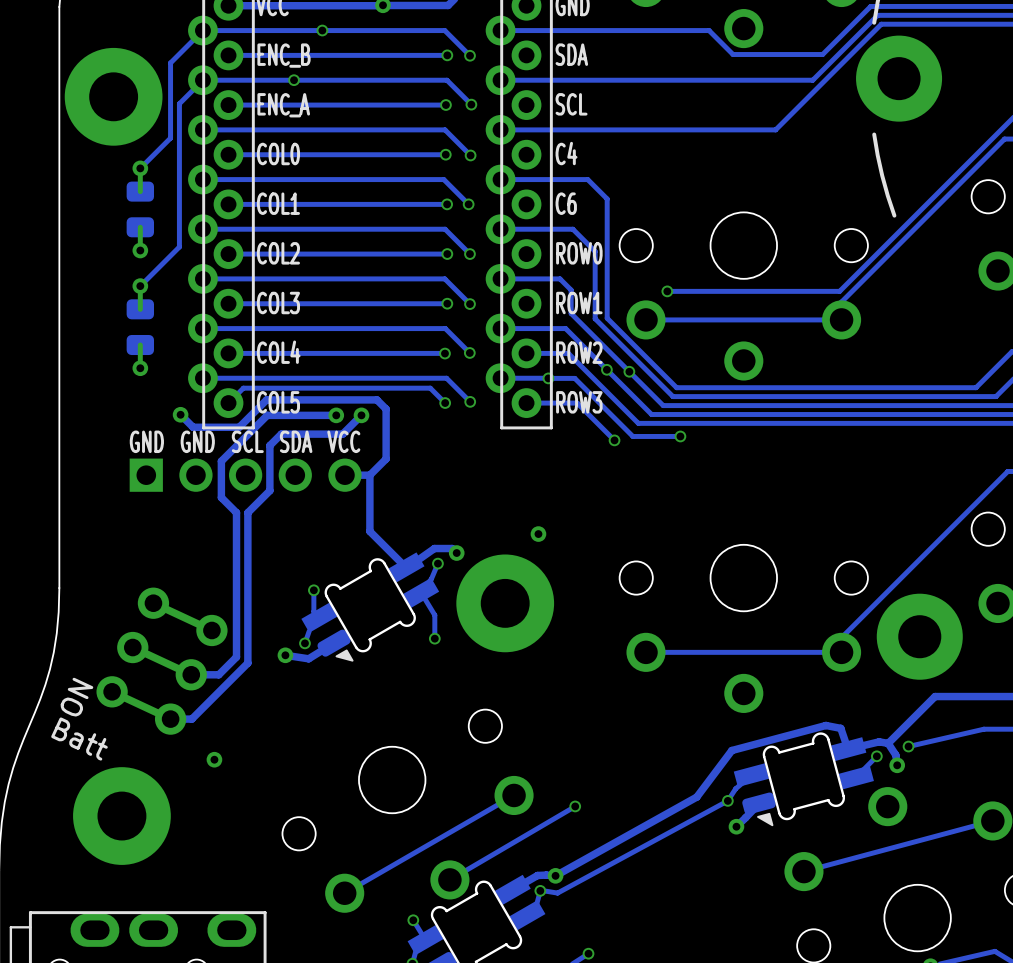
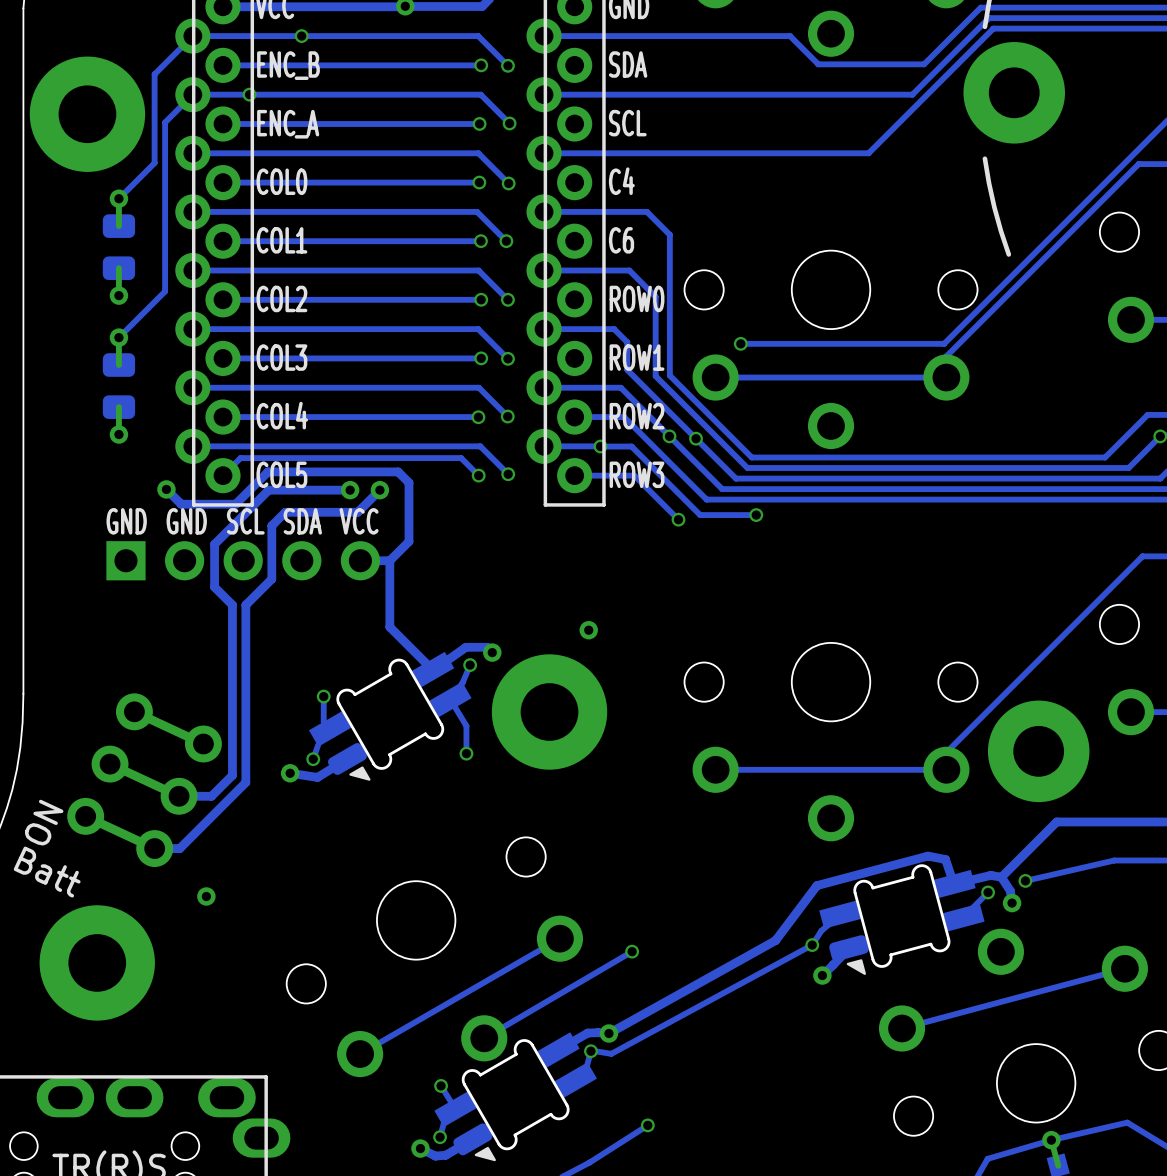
via: none -> (301, 36)
via: (322, 30) -> none
via: none -> (249, 94)
via: (294, 80) -> none

